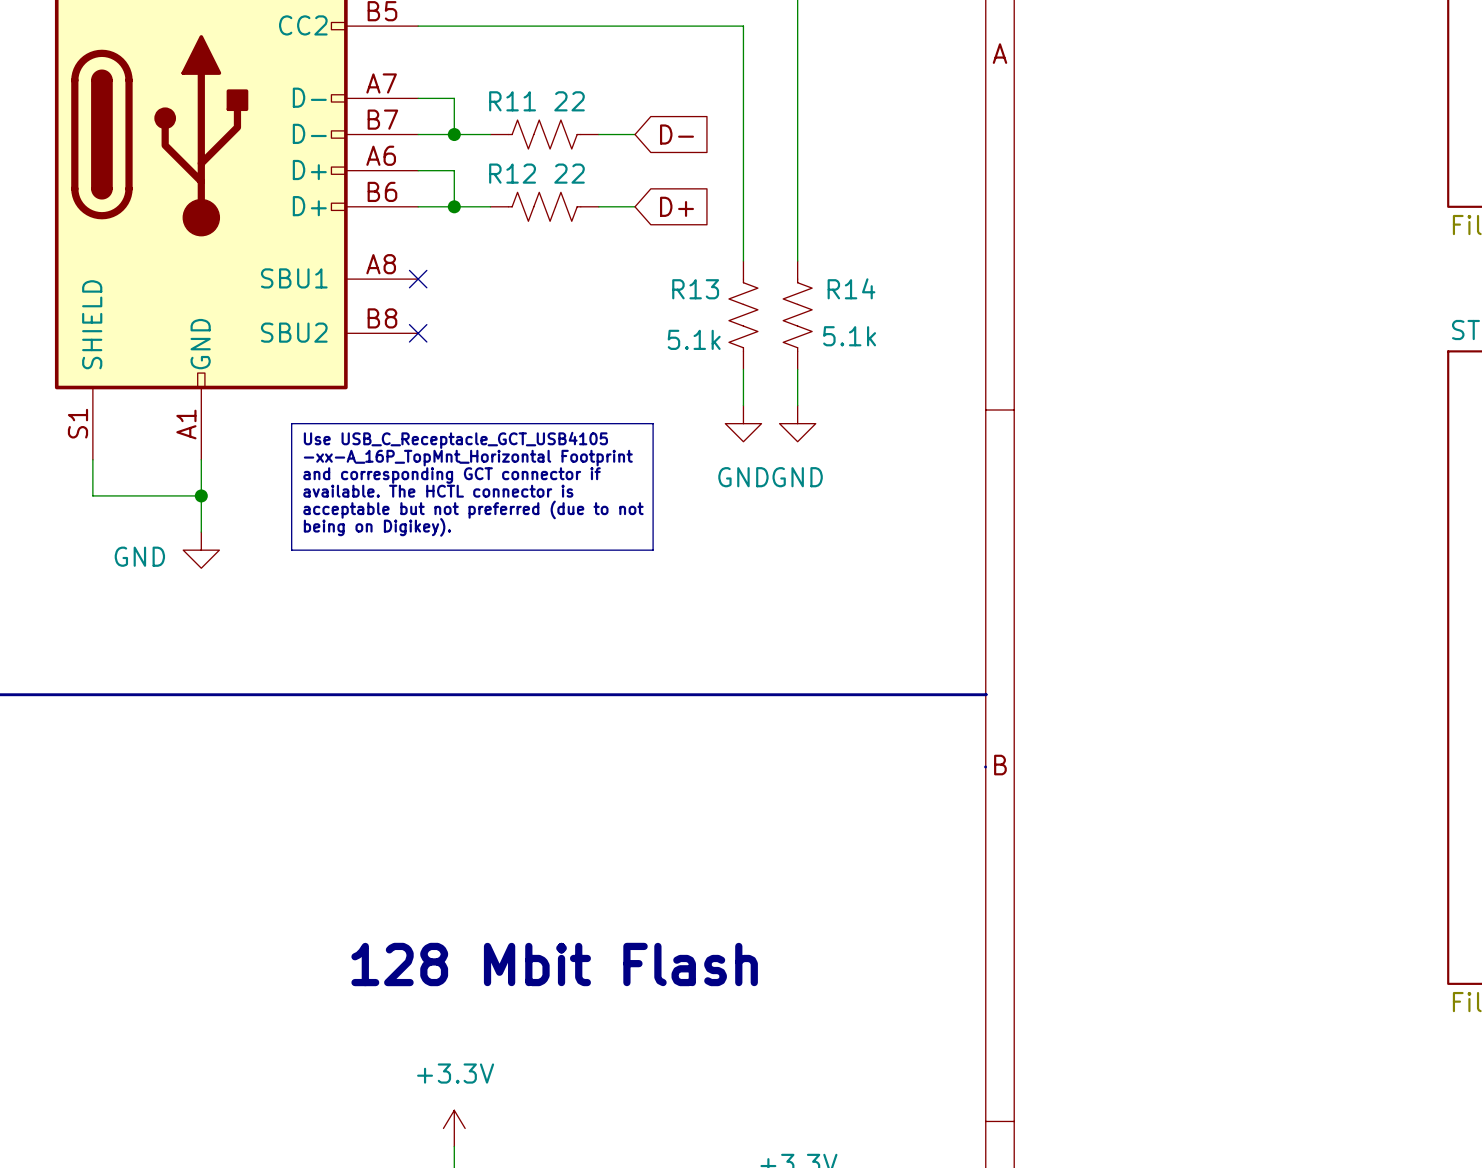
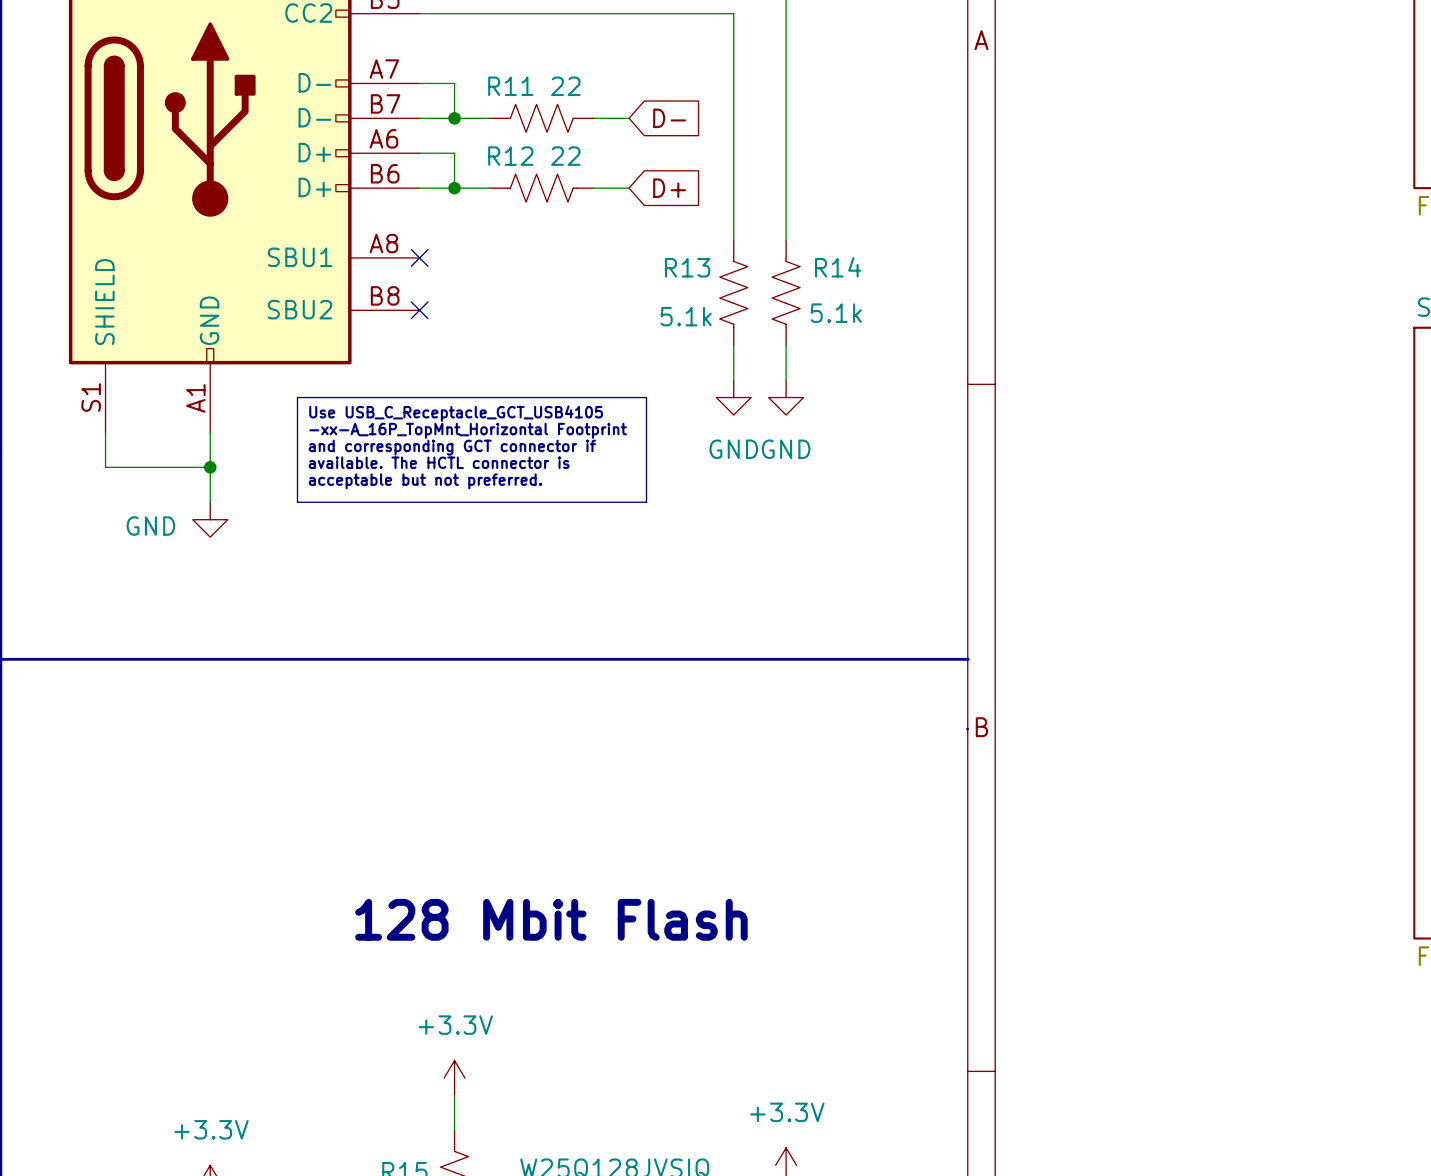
text: acceptable but not preferred (due to not (473, 509) -> acceptable but not preferred. (425, 481)
text: being on Digikey). (377, 527) -> none
line: (291, 532) (291, 550) (653, 550) (653, 532) -> (297, 502) (646, 502)

